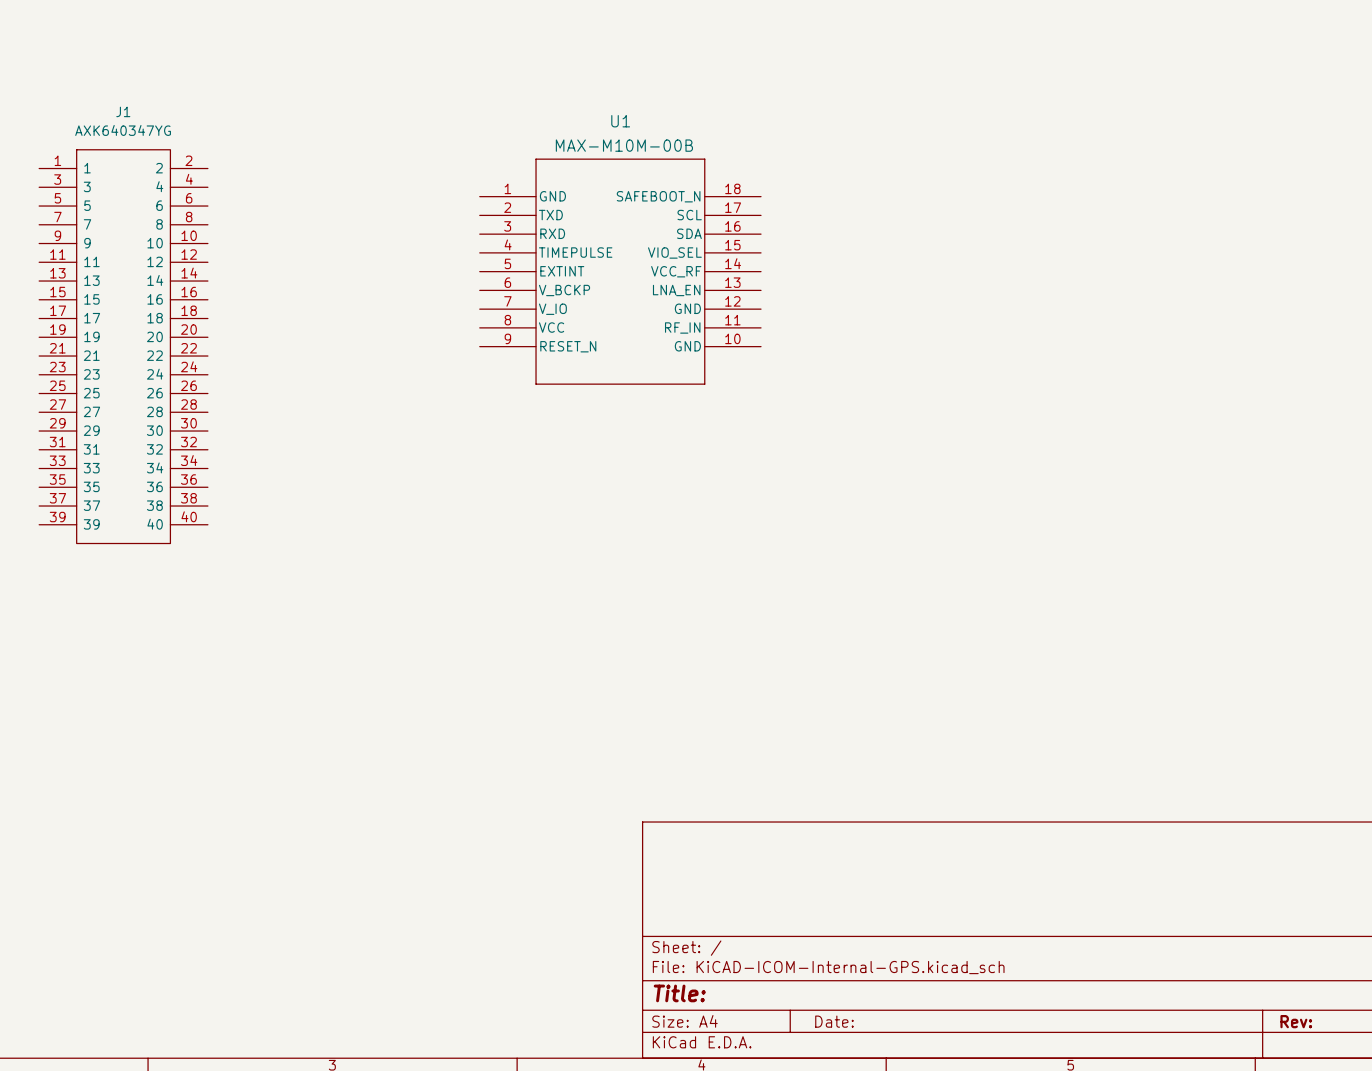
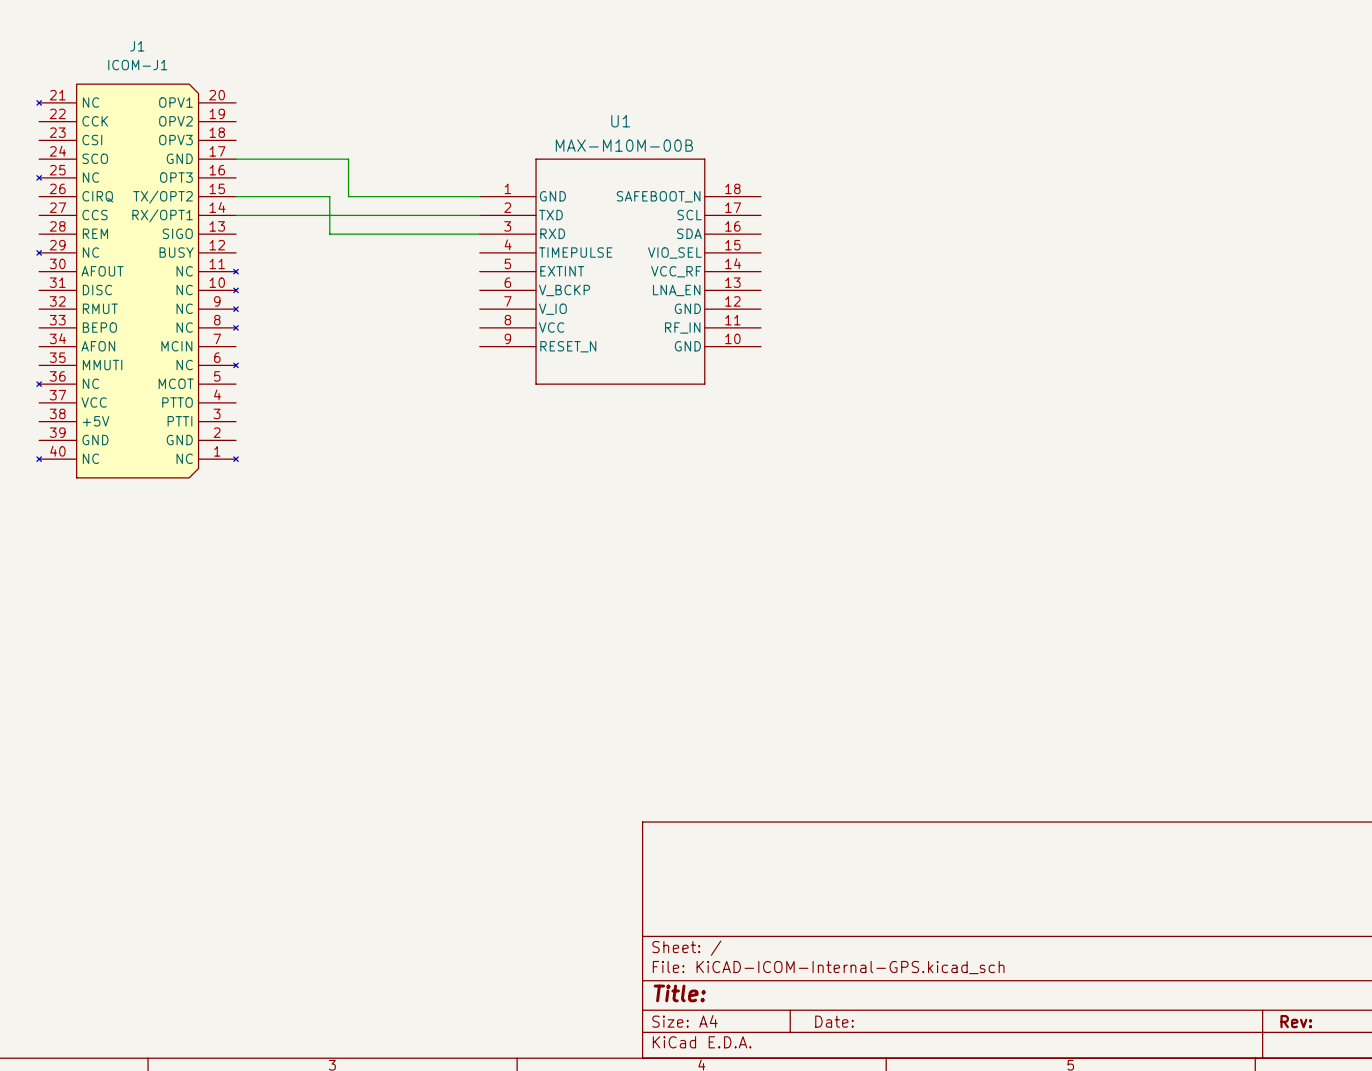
J1 value: AXK640347YG (123, 130) -> ICOM-J1 (137, 65)
J1 symbol: [39, 149, 208, 545] -> [36, 84, 239, 478]
wire: none -> (236, 159) (348, 159) (348, 196) (479, 196)
wire: none -> (236, 196) (329, 196) (329, 234) (479, 234)
wire: none -> (236, 215) (479, 215)

